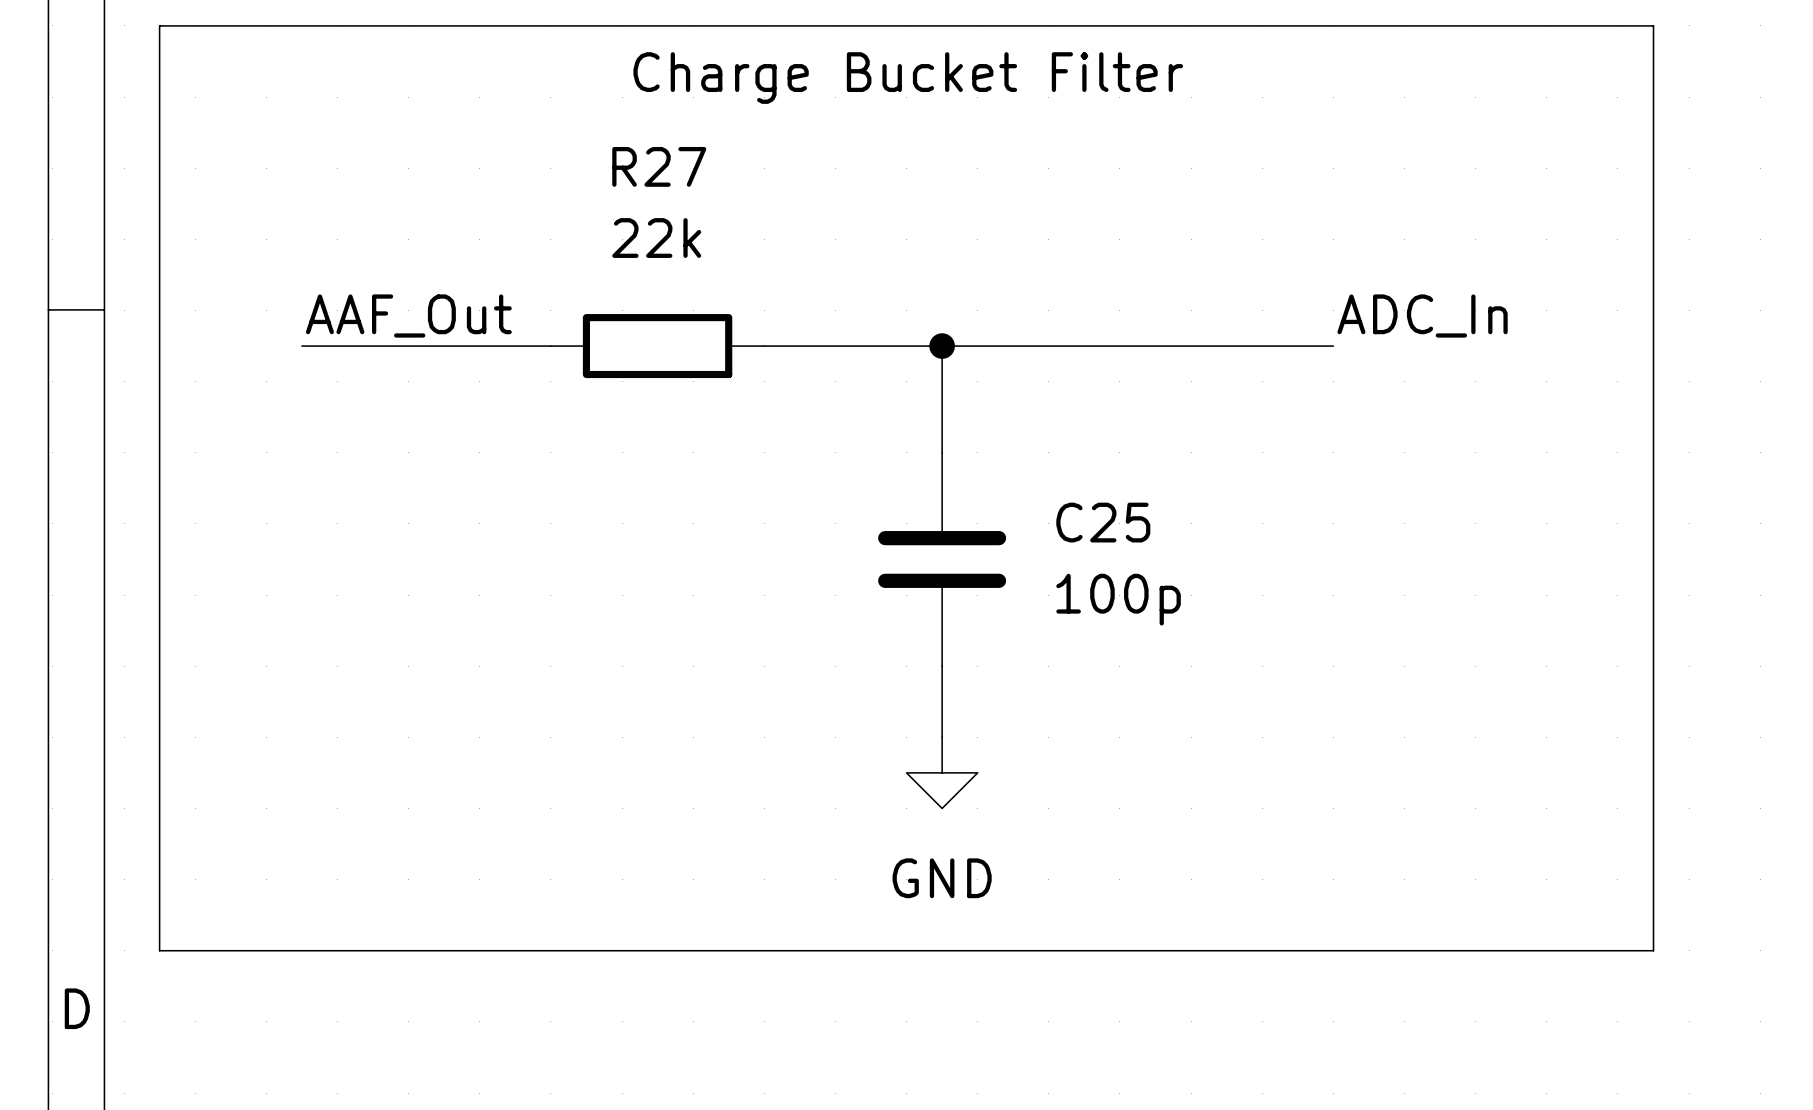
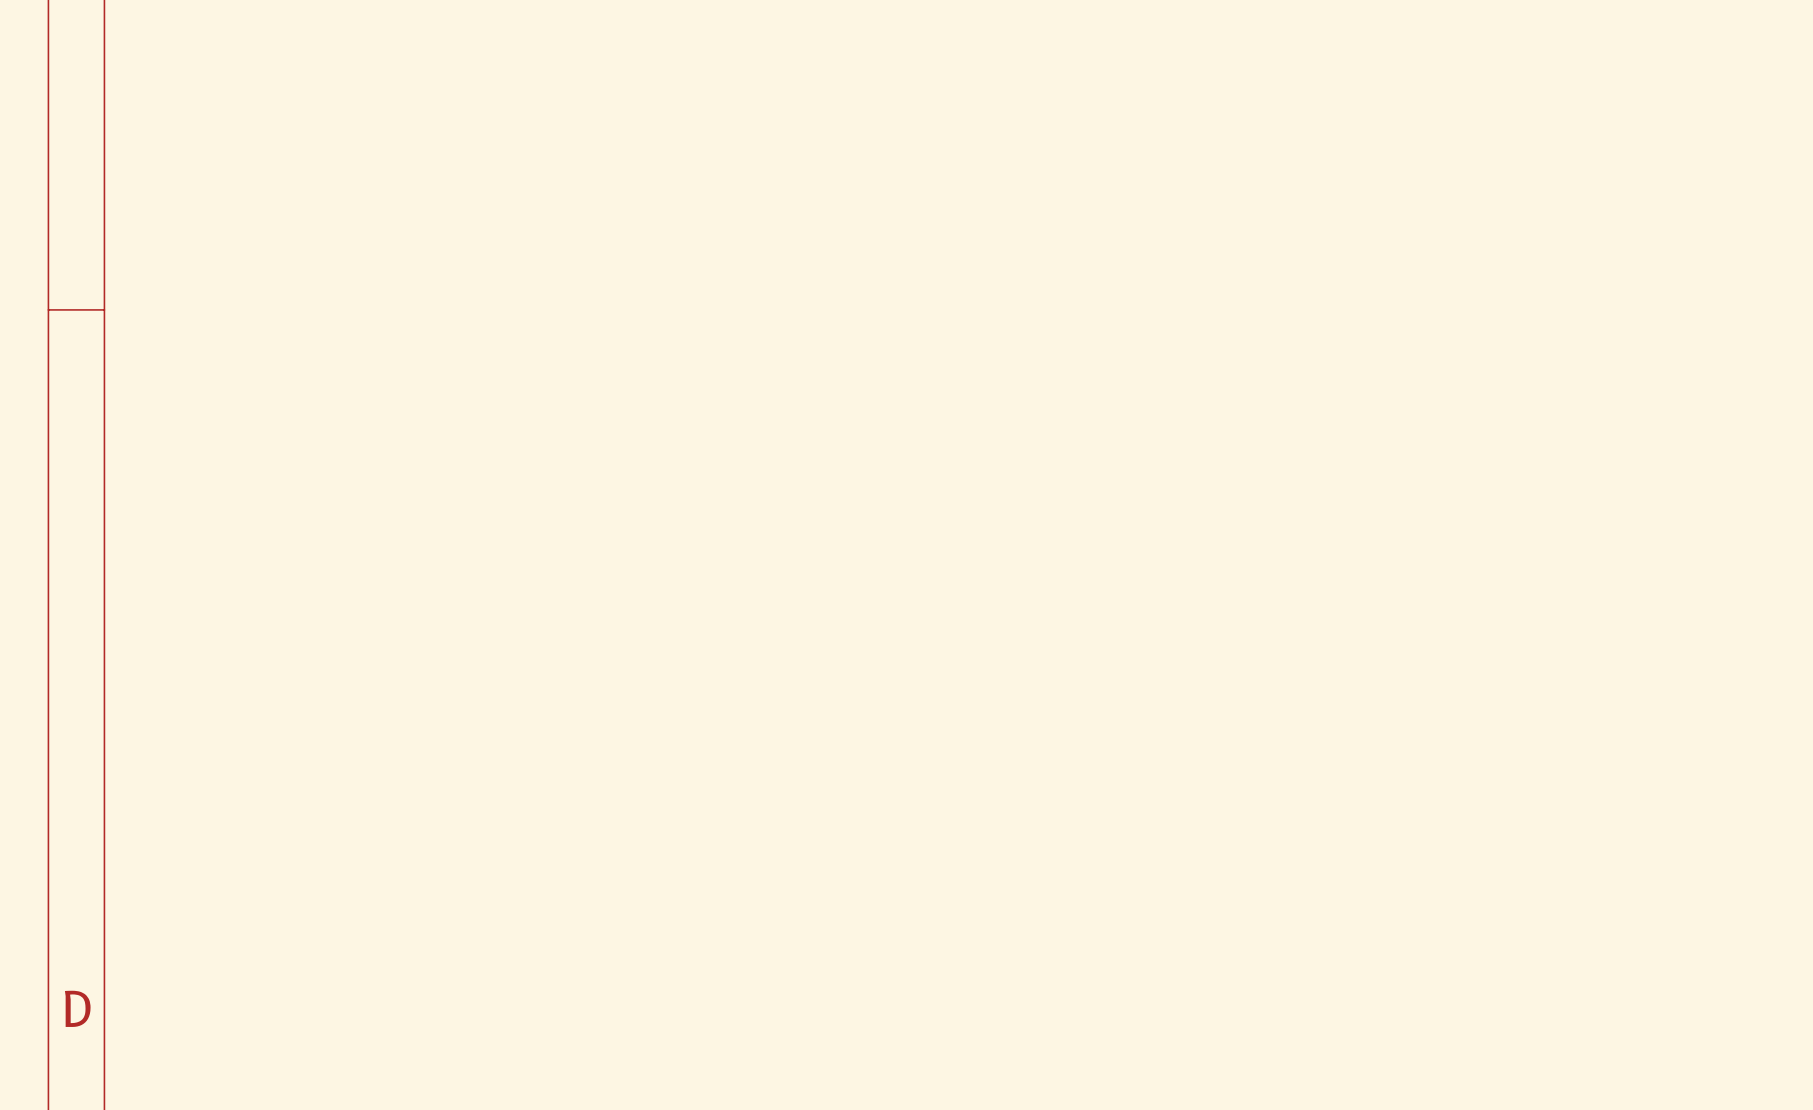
line: (159, 25) (159, 950) (1653, 950) (1653, 25) (159, 25) -> none
text: Charge Bucket Filter (908, 78) -> none
label: AAF_Out (408, 316) -> none
label: ADC_In (1422, 316) -> none
wire: (301, 346) (550, 346) -> none
R27: 22k (657, 346) -> none
wire: (764, 346) (1333, 346) -> none
wire: (942, 346) (942, 452) -> none
junction: (942, 346) -> none
C25: 100p (942, 559) -> none
wire: (942, 666) (942, 737) -> none
power symbol: GND (942, 772) -> none

